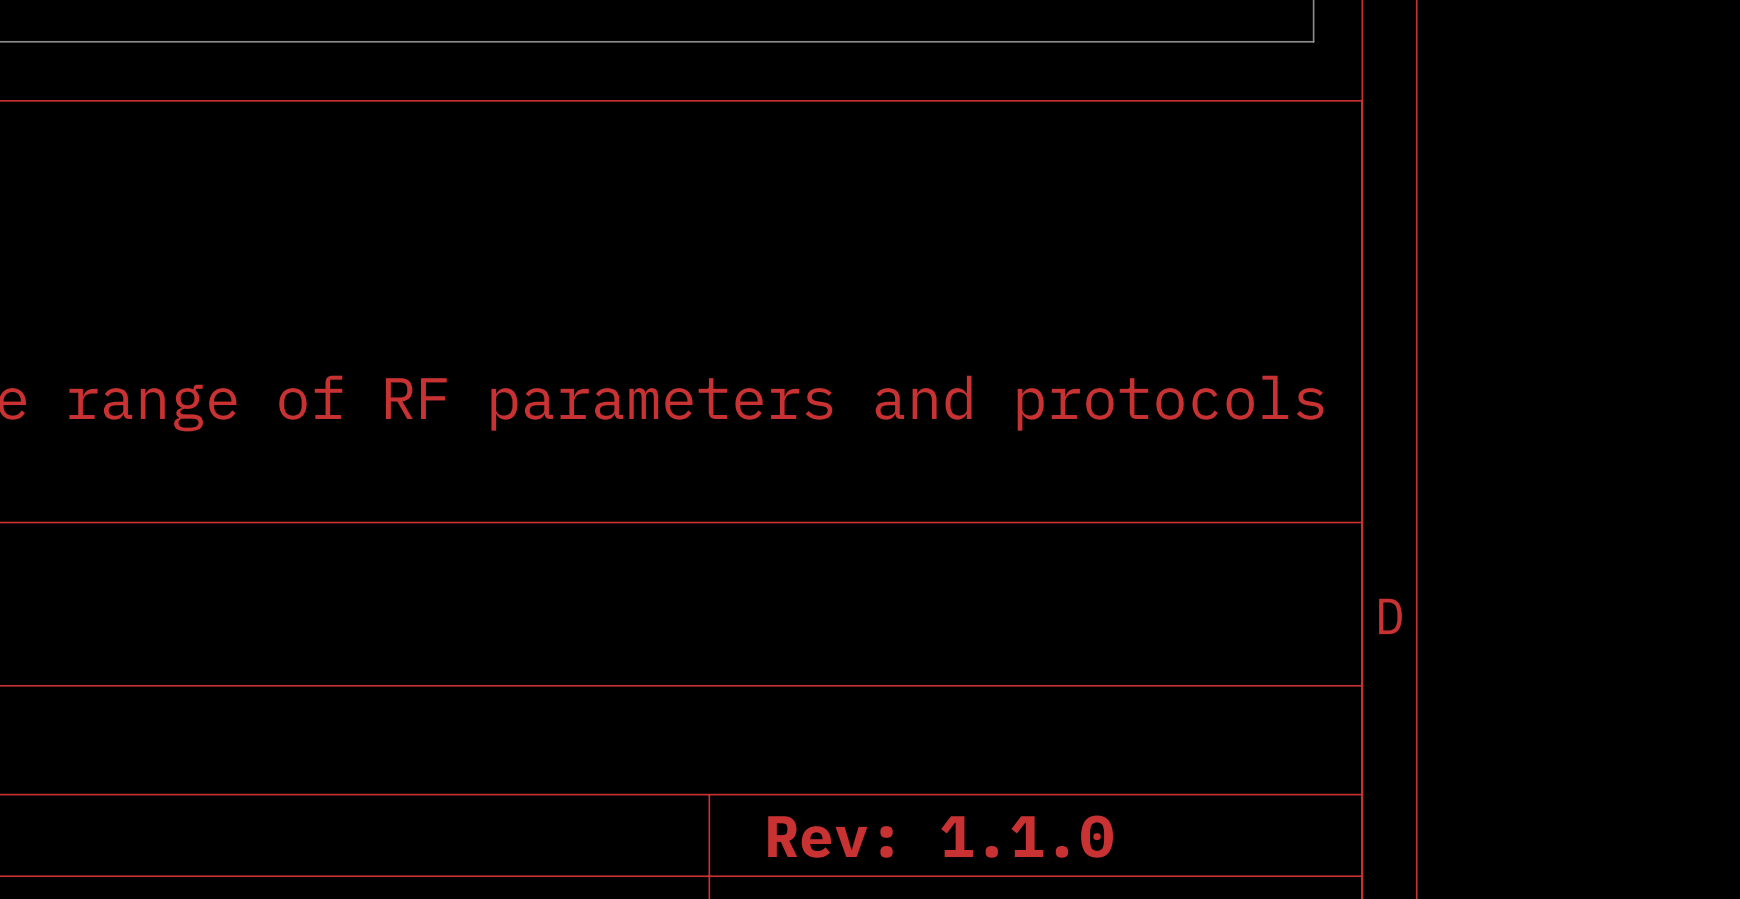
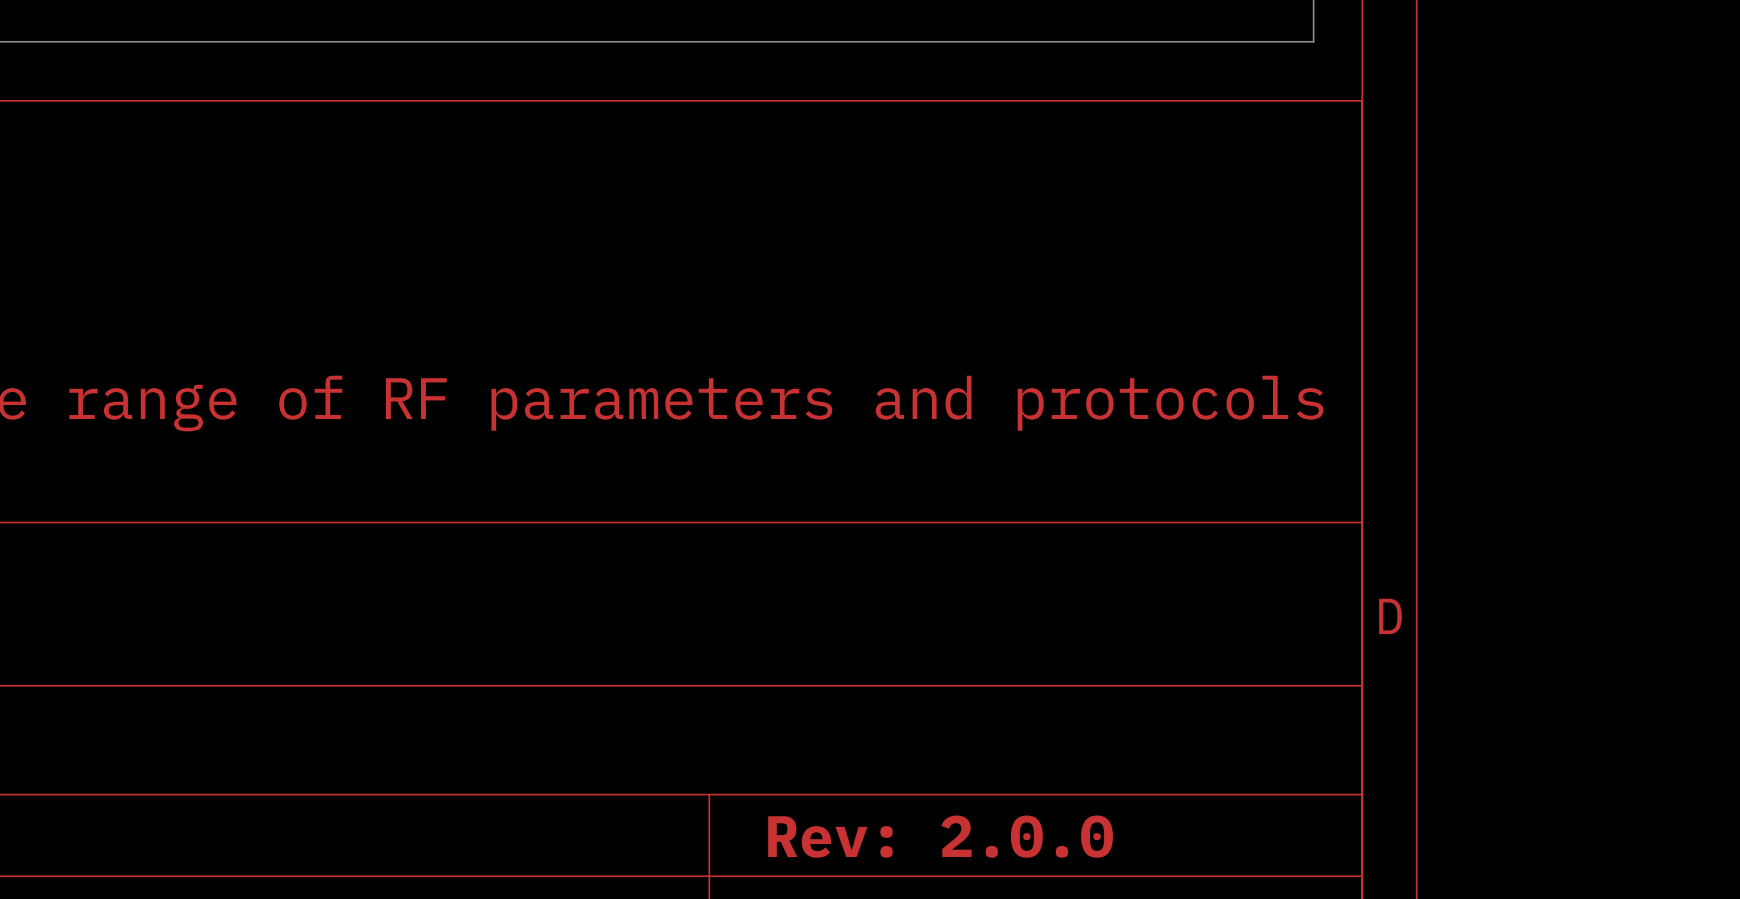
title block: Rev: 1.1.0 (940, 836) -> Rev: 2.0.0 (940, 836)

